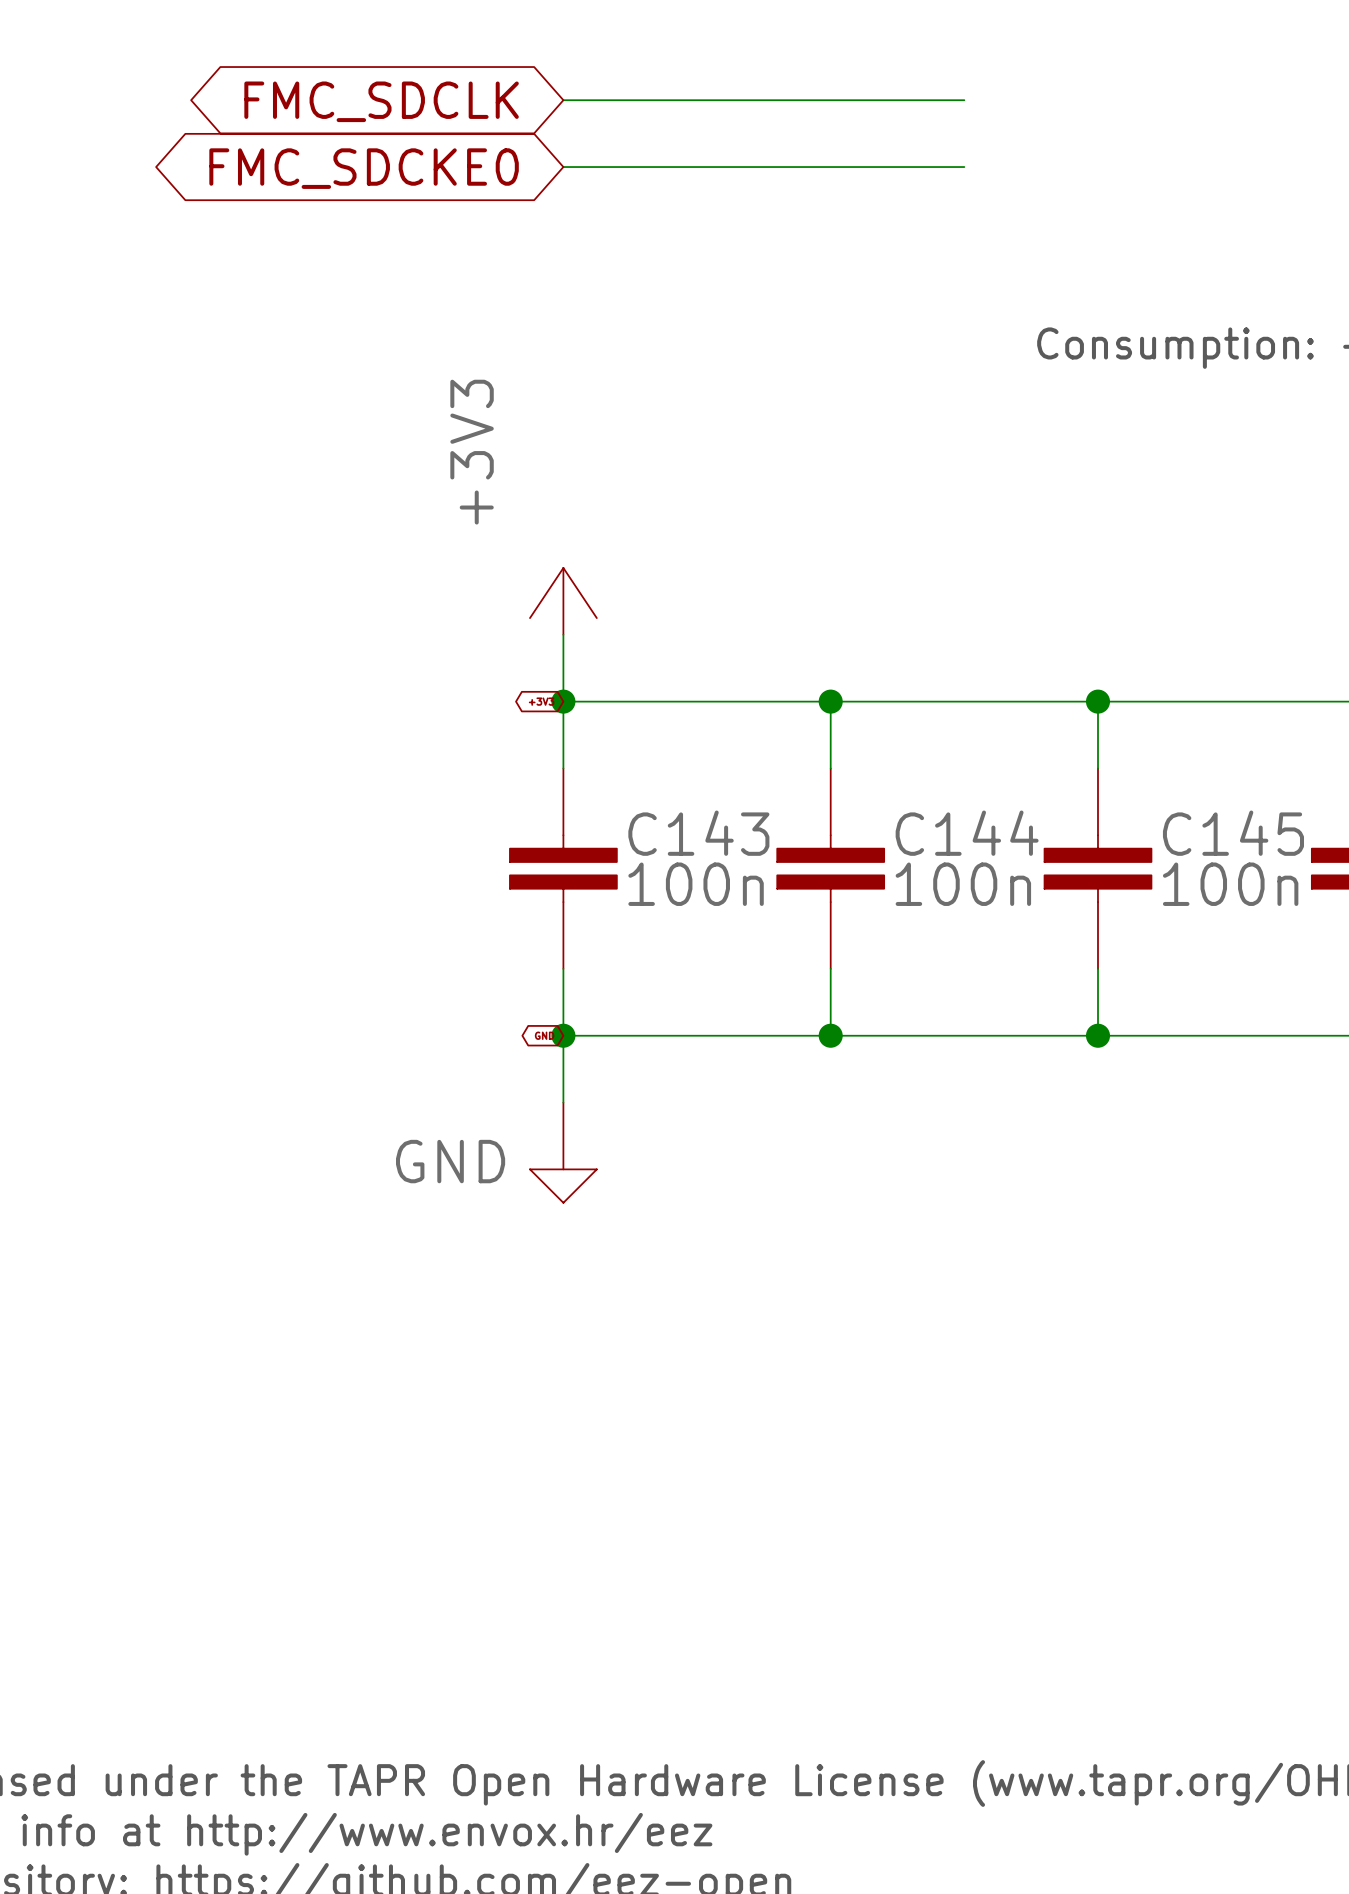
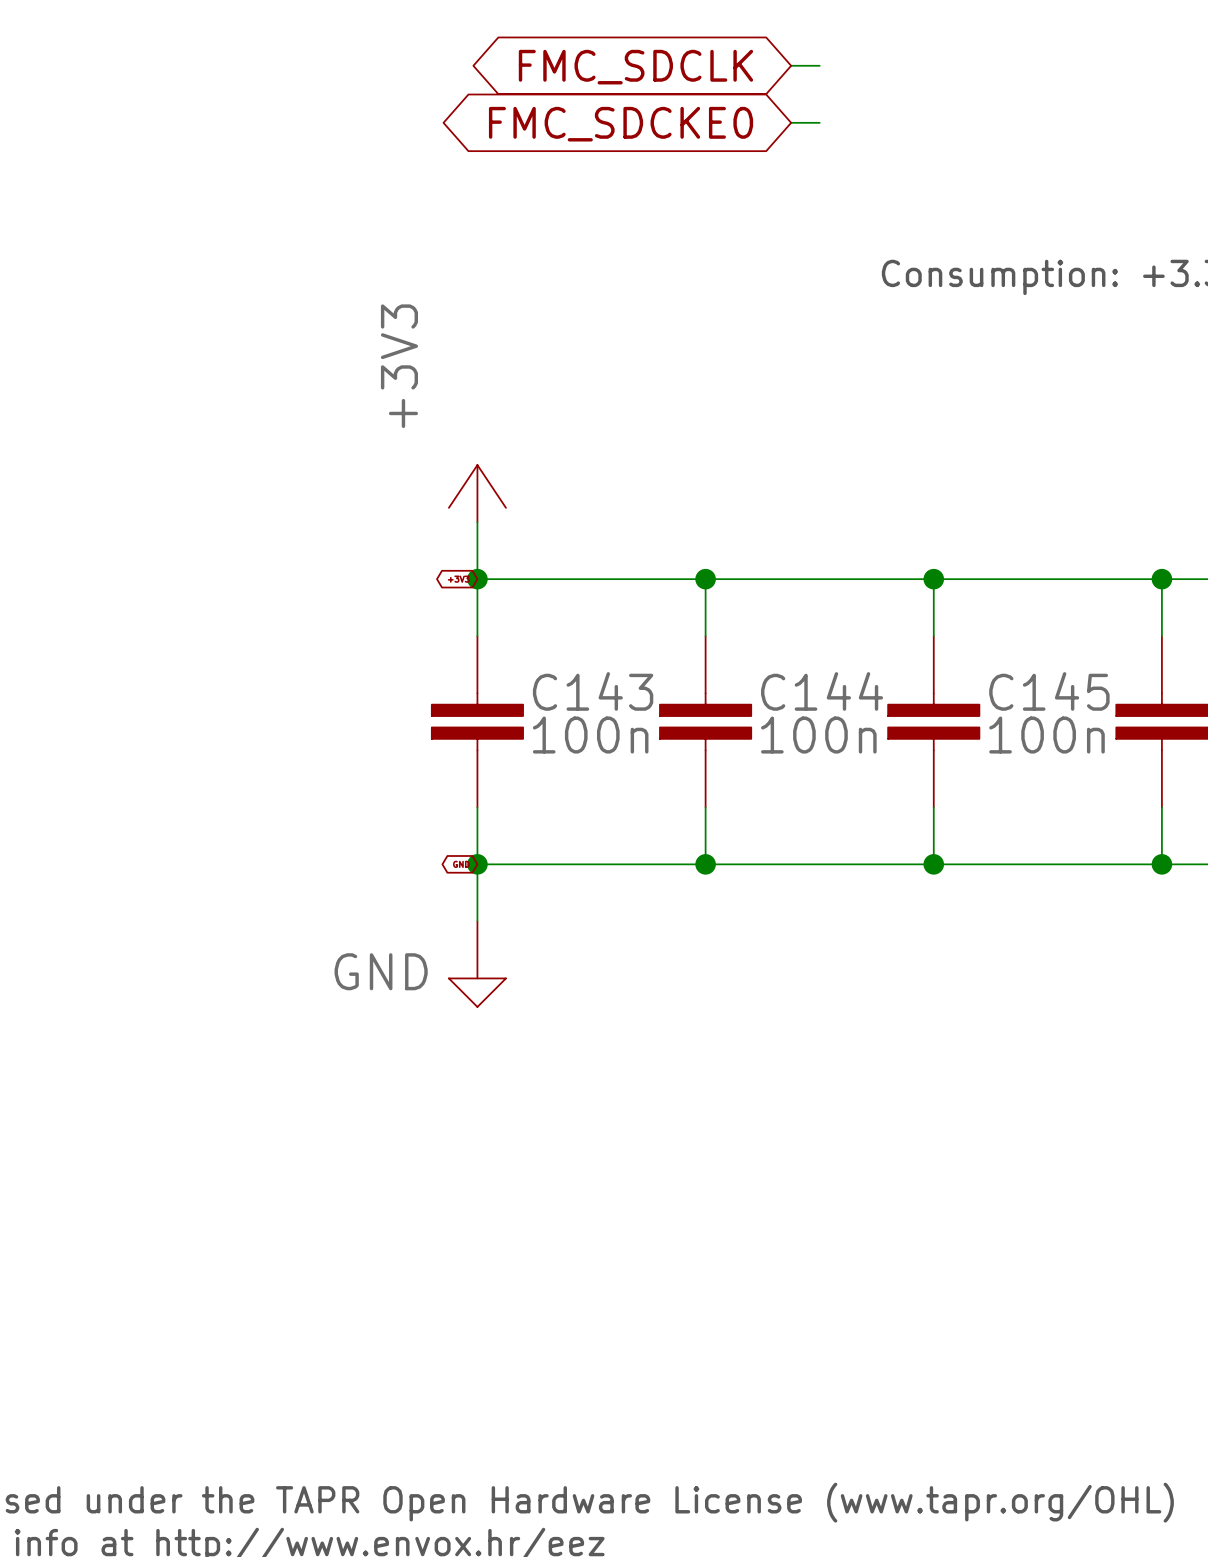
wire: (563, 100) (930, 100) -> none
global label position: FMC_SDCLK (381, 101) -> FMC_SDCLK (635, 67)
wire: (563, 167) (930, 167) -> none
global label position: FMC_SDCKE0 (364, 168) -> FMC_SDCKE0 (621, 124)

